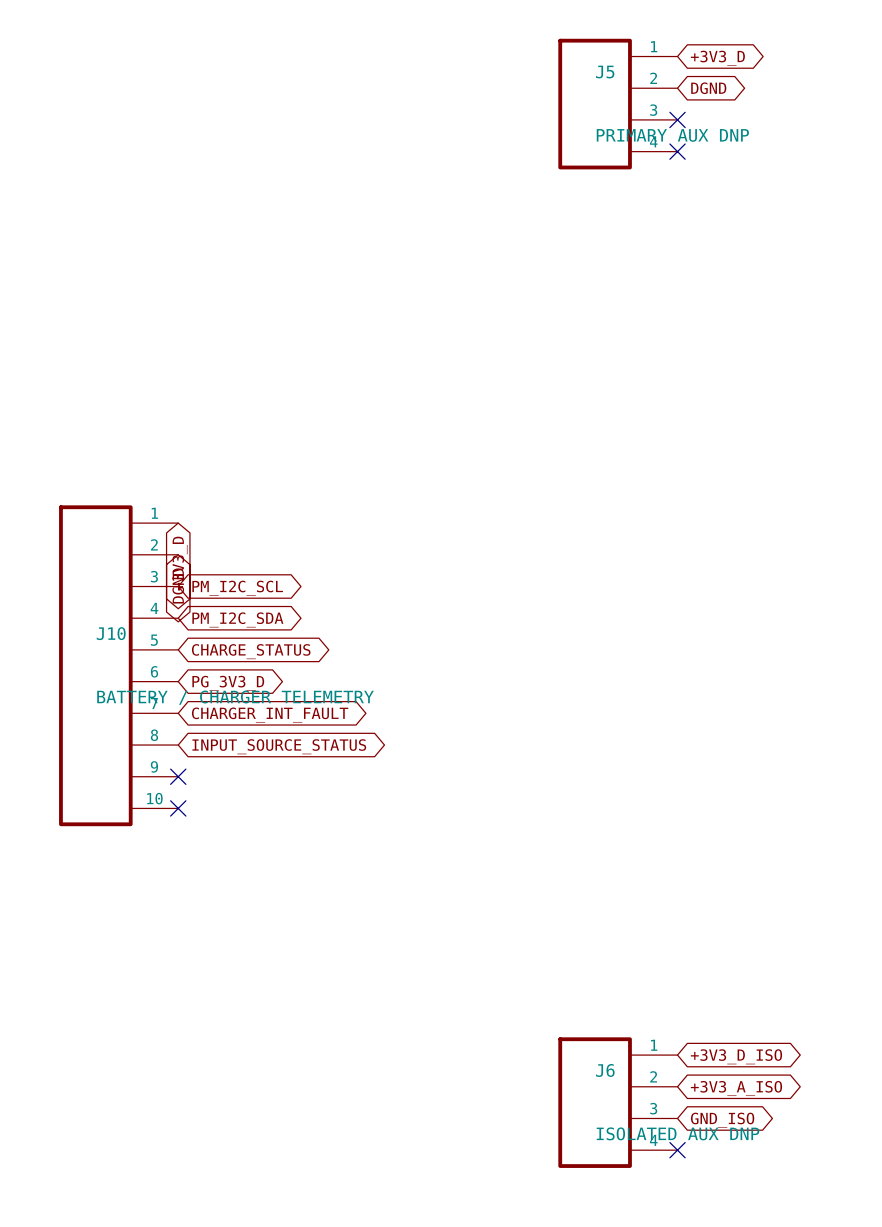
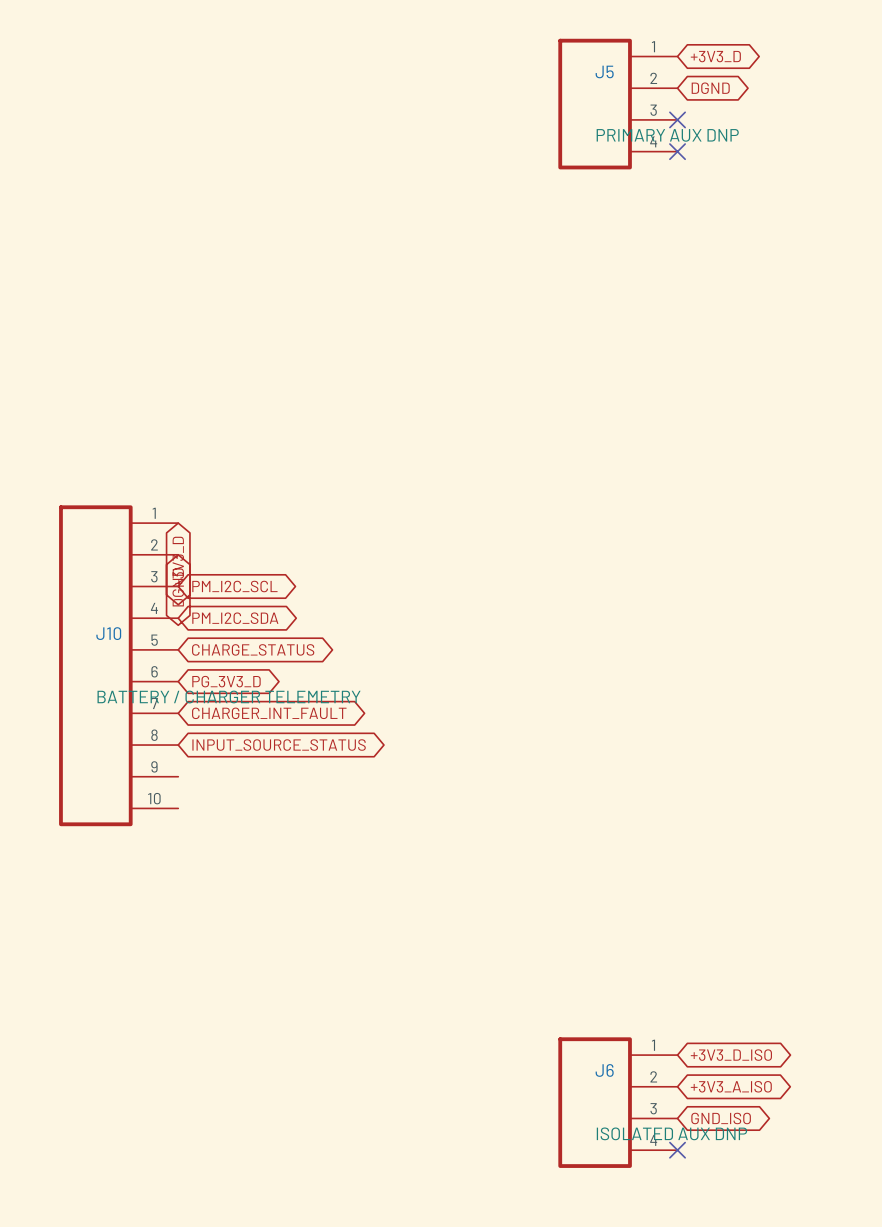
no-connect mark: (178, 776) -> none
no-connect mark: (178, 808) -> none

